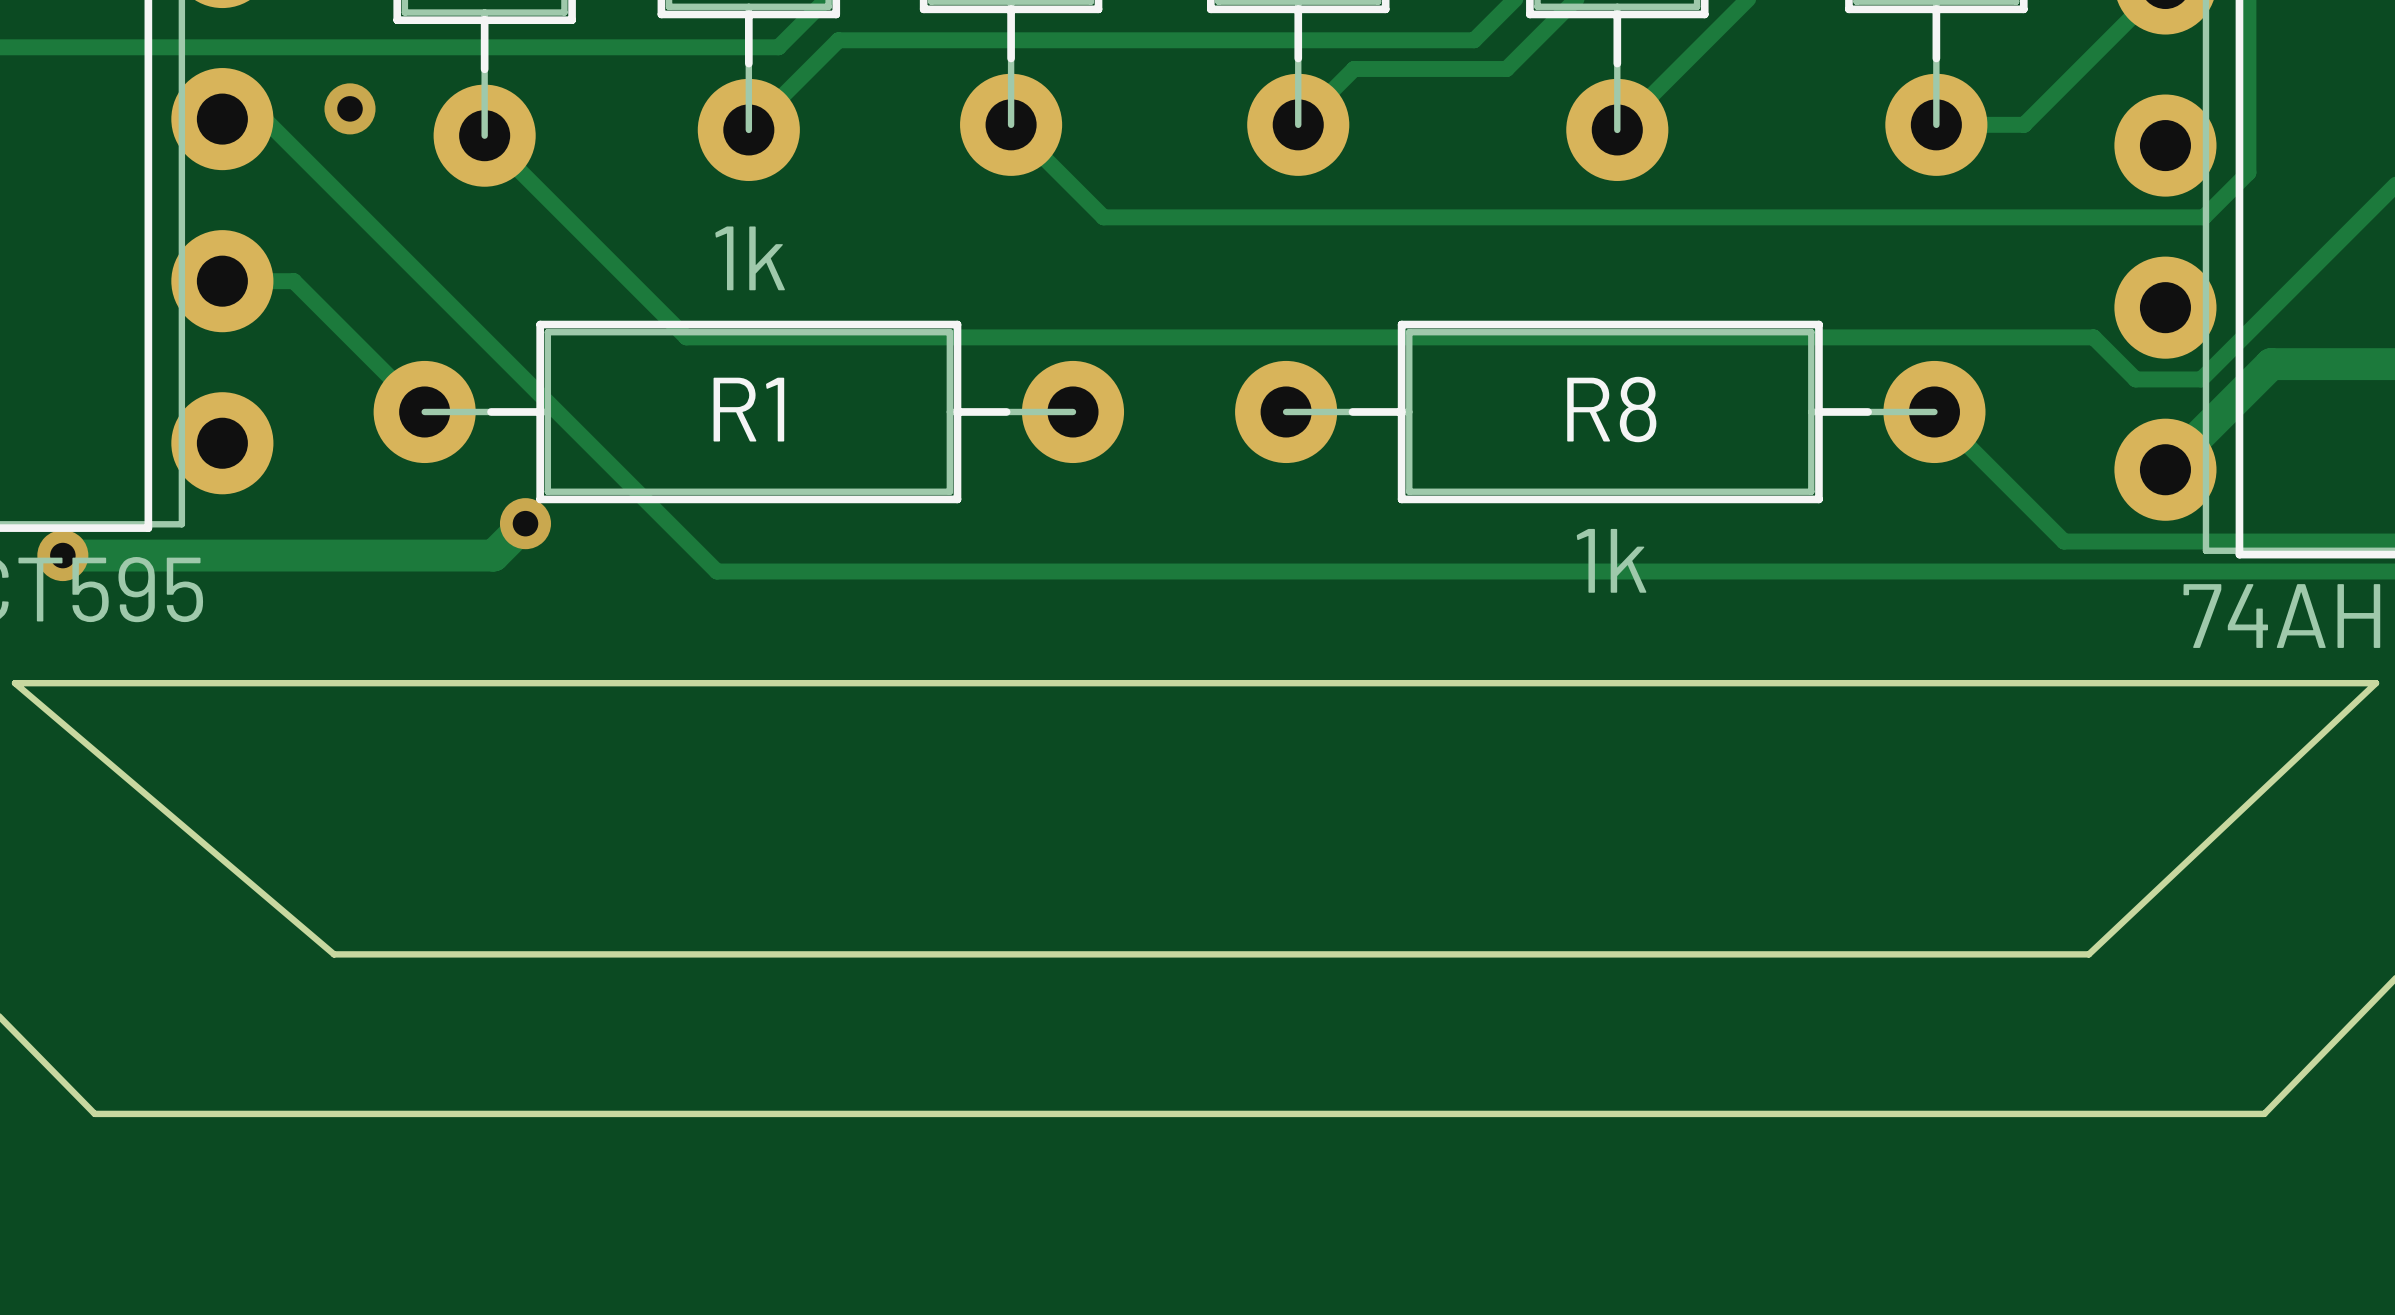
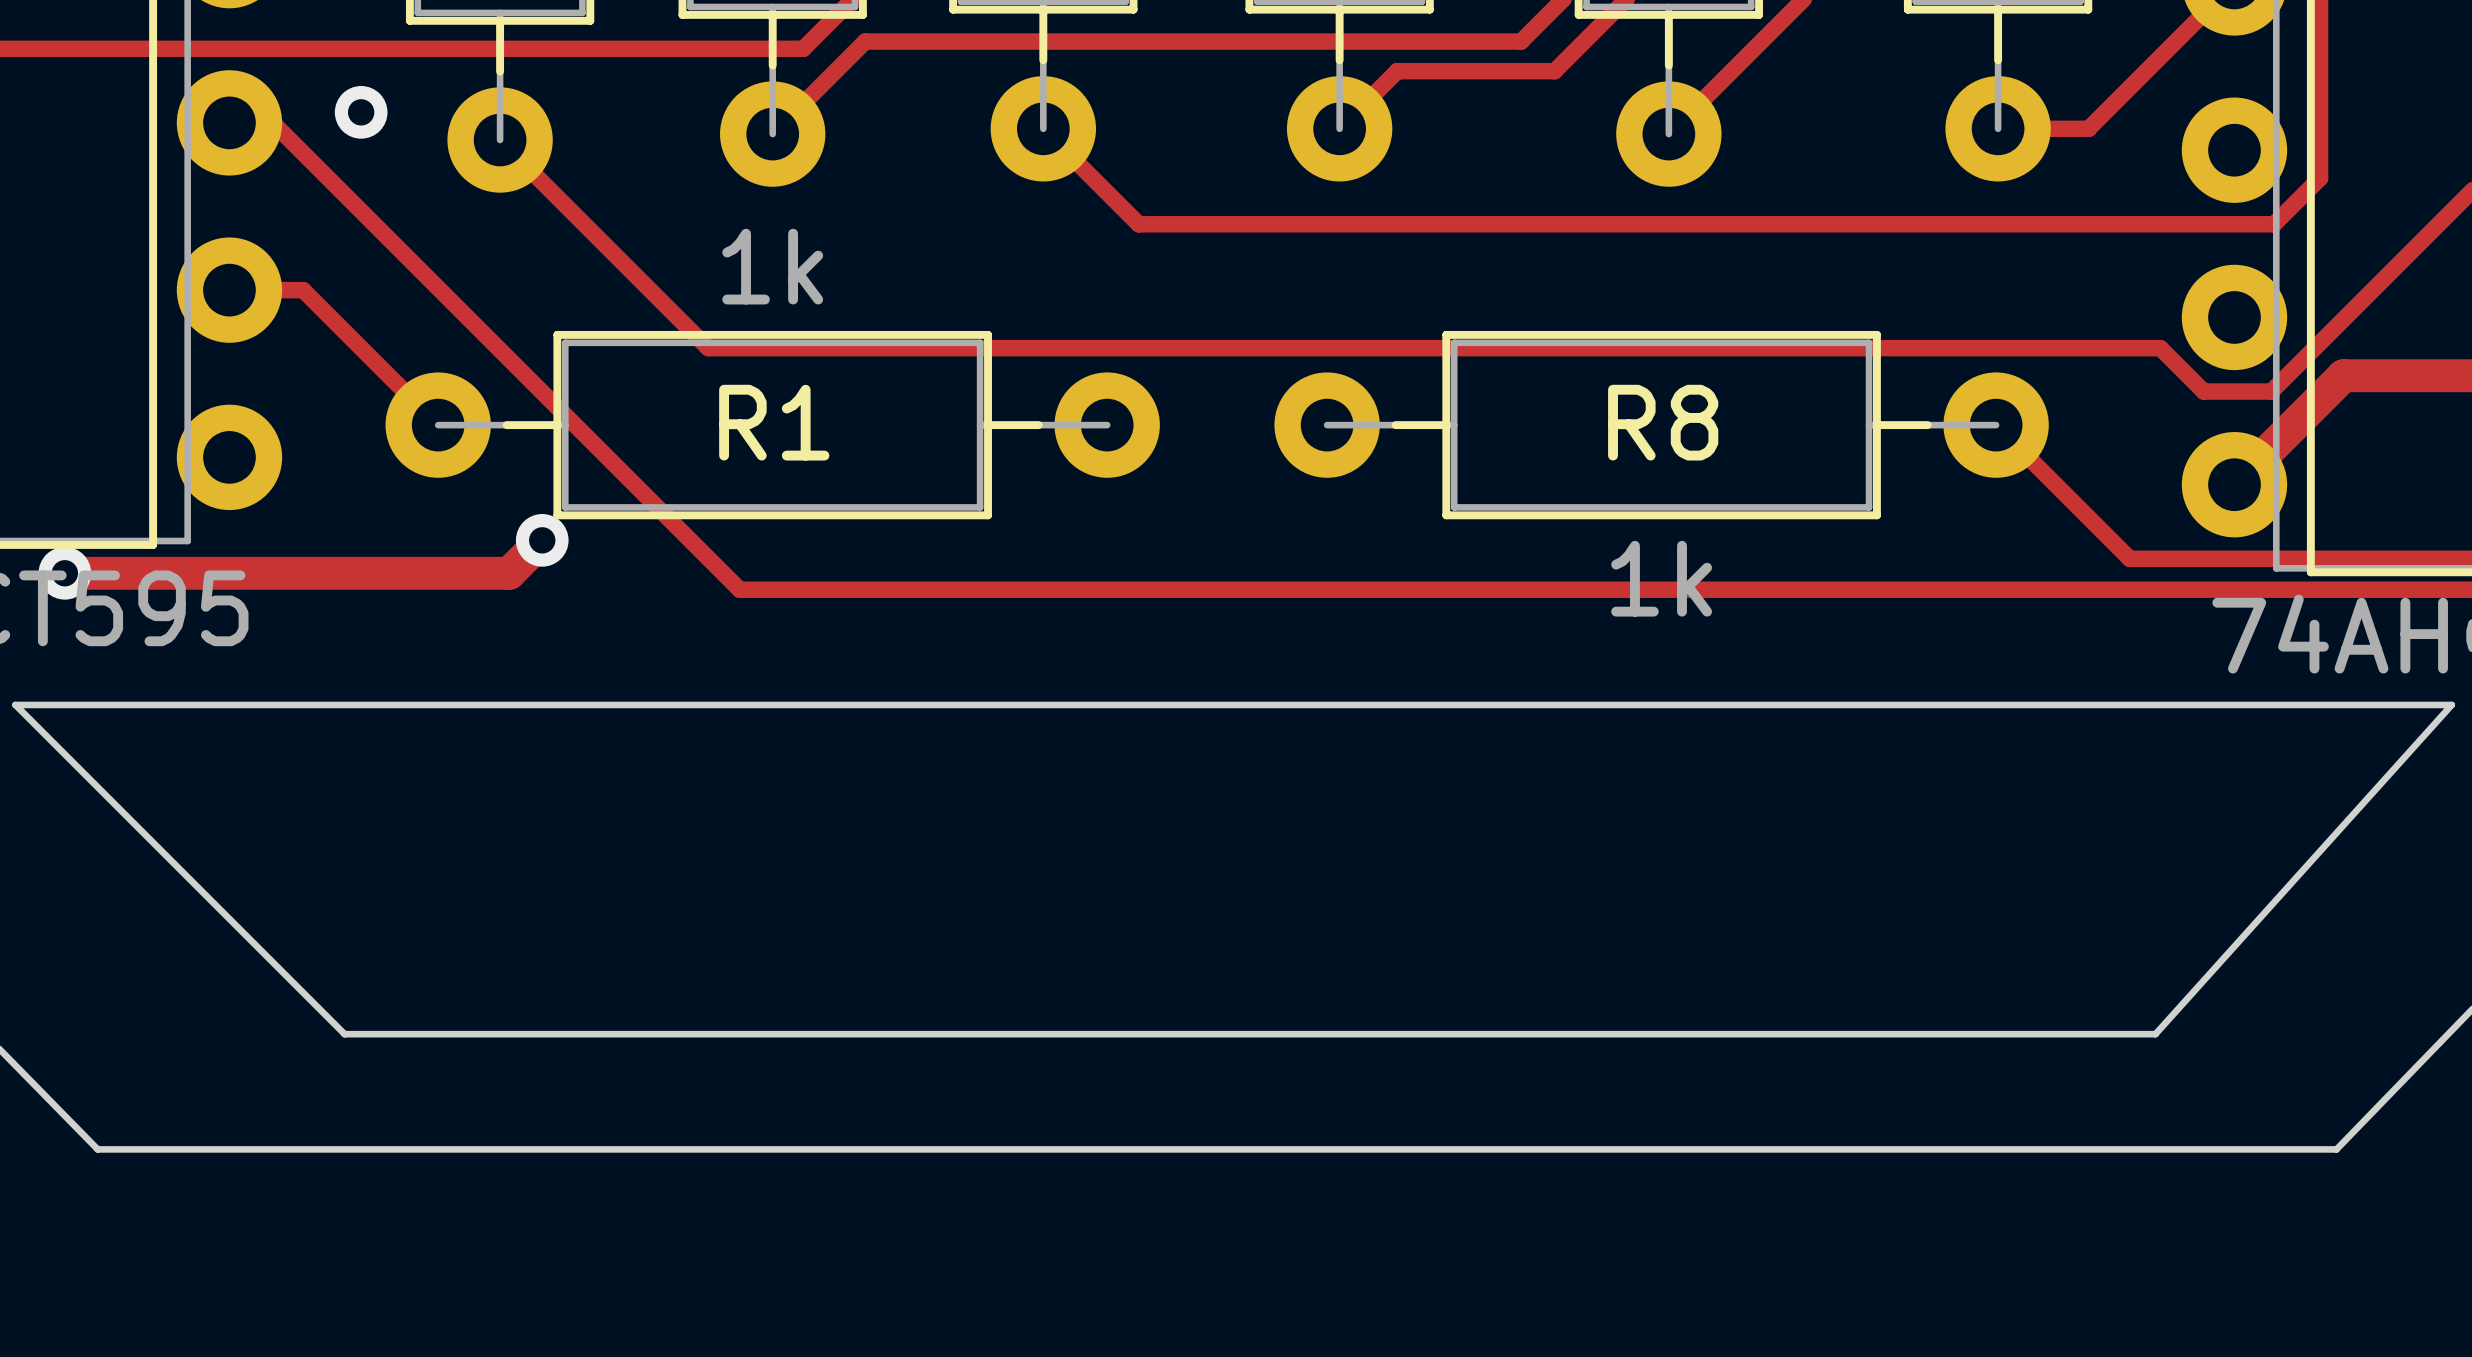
board edge: (14, 683) (334, 954) (2088, 954) (2376, 683) -> (15, 704) (344, 1034) (2155, 1034) (2451, 704)

